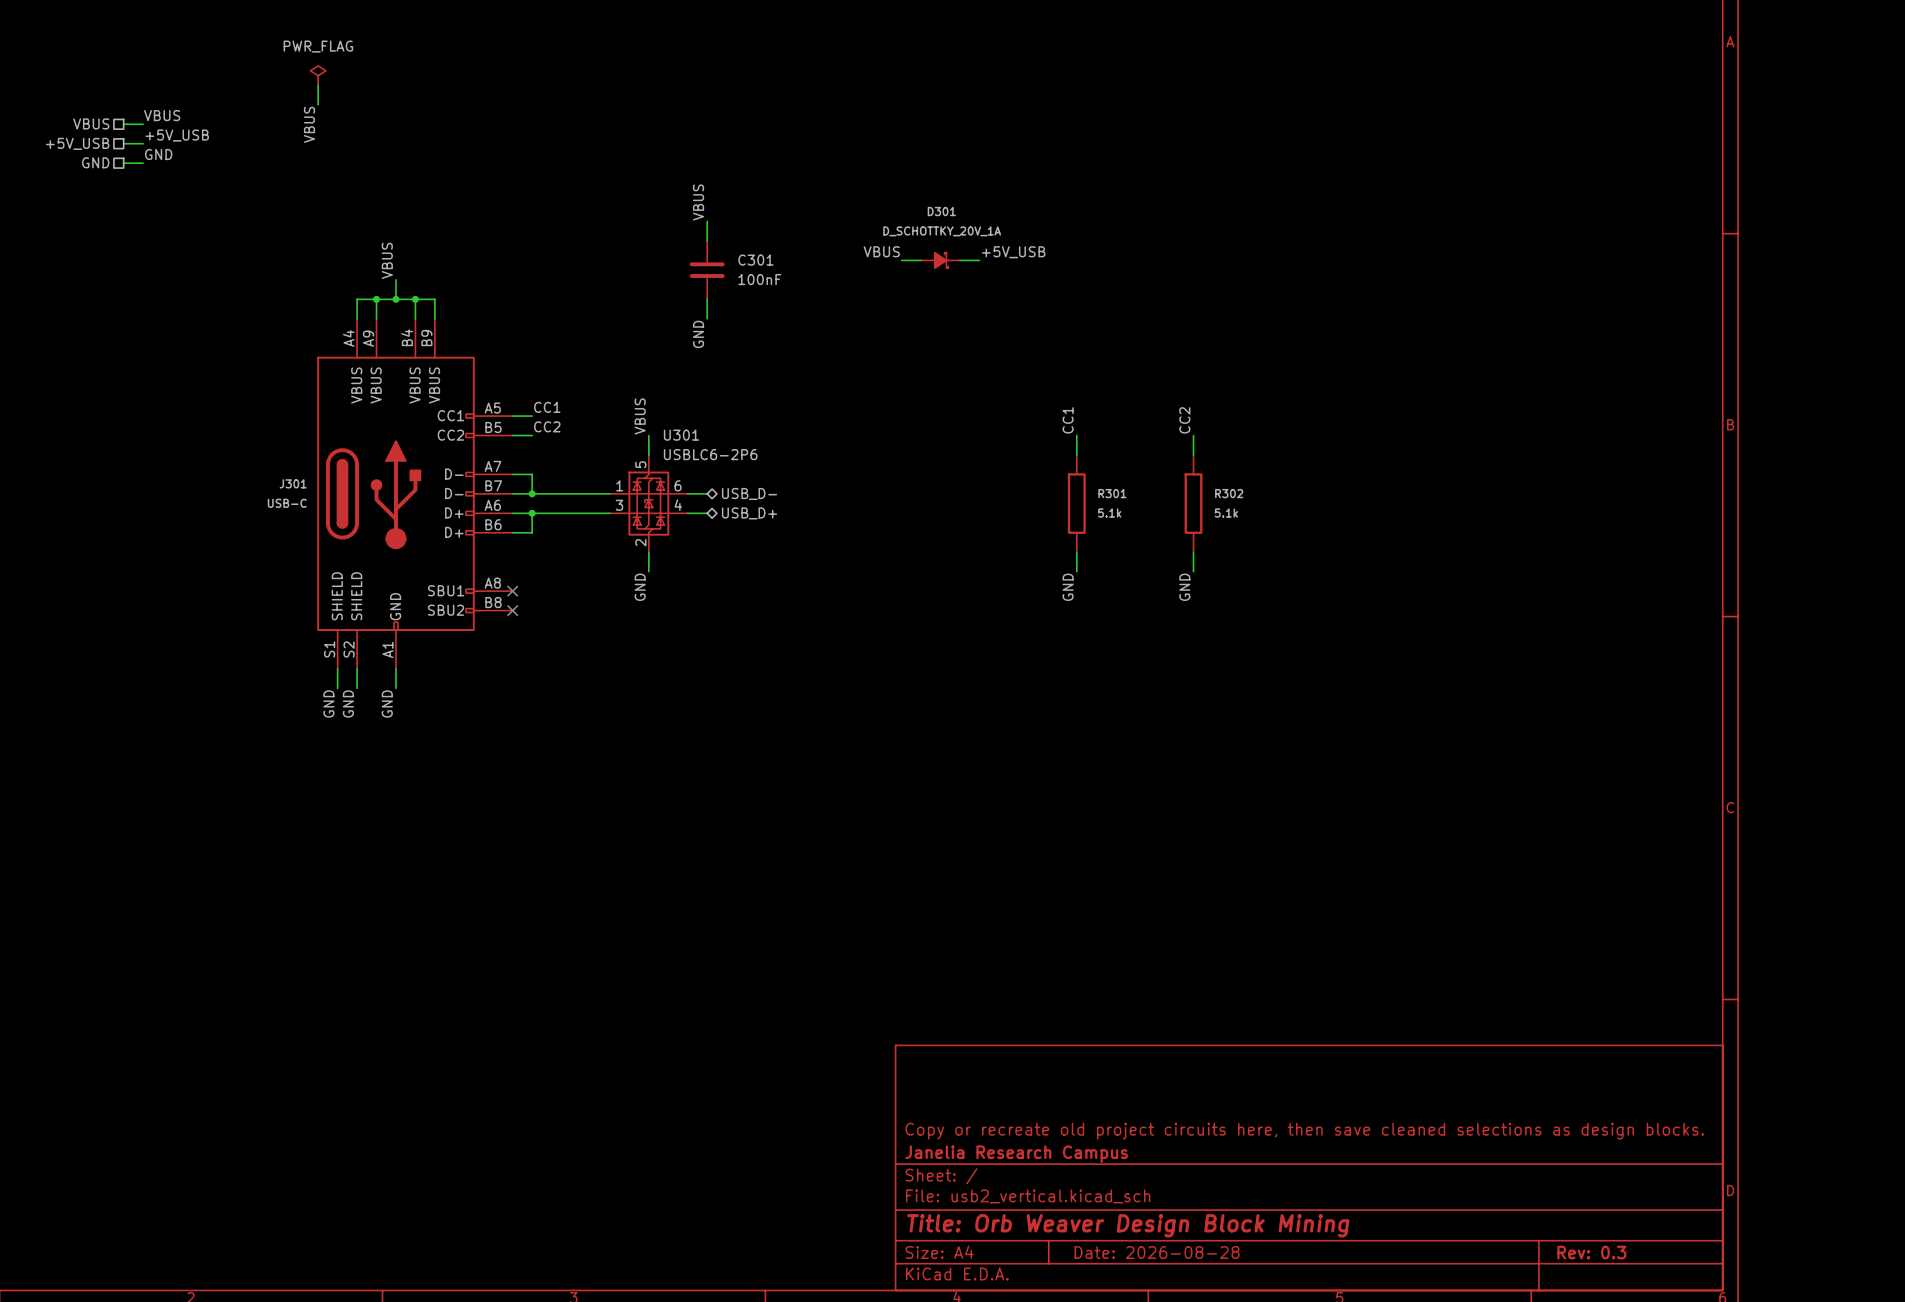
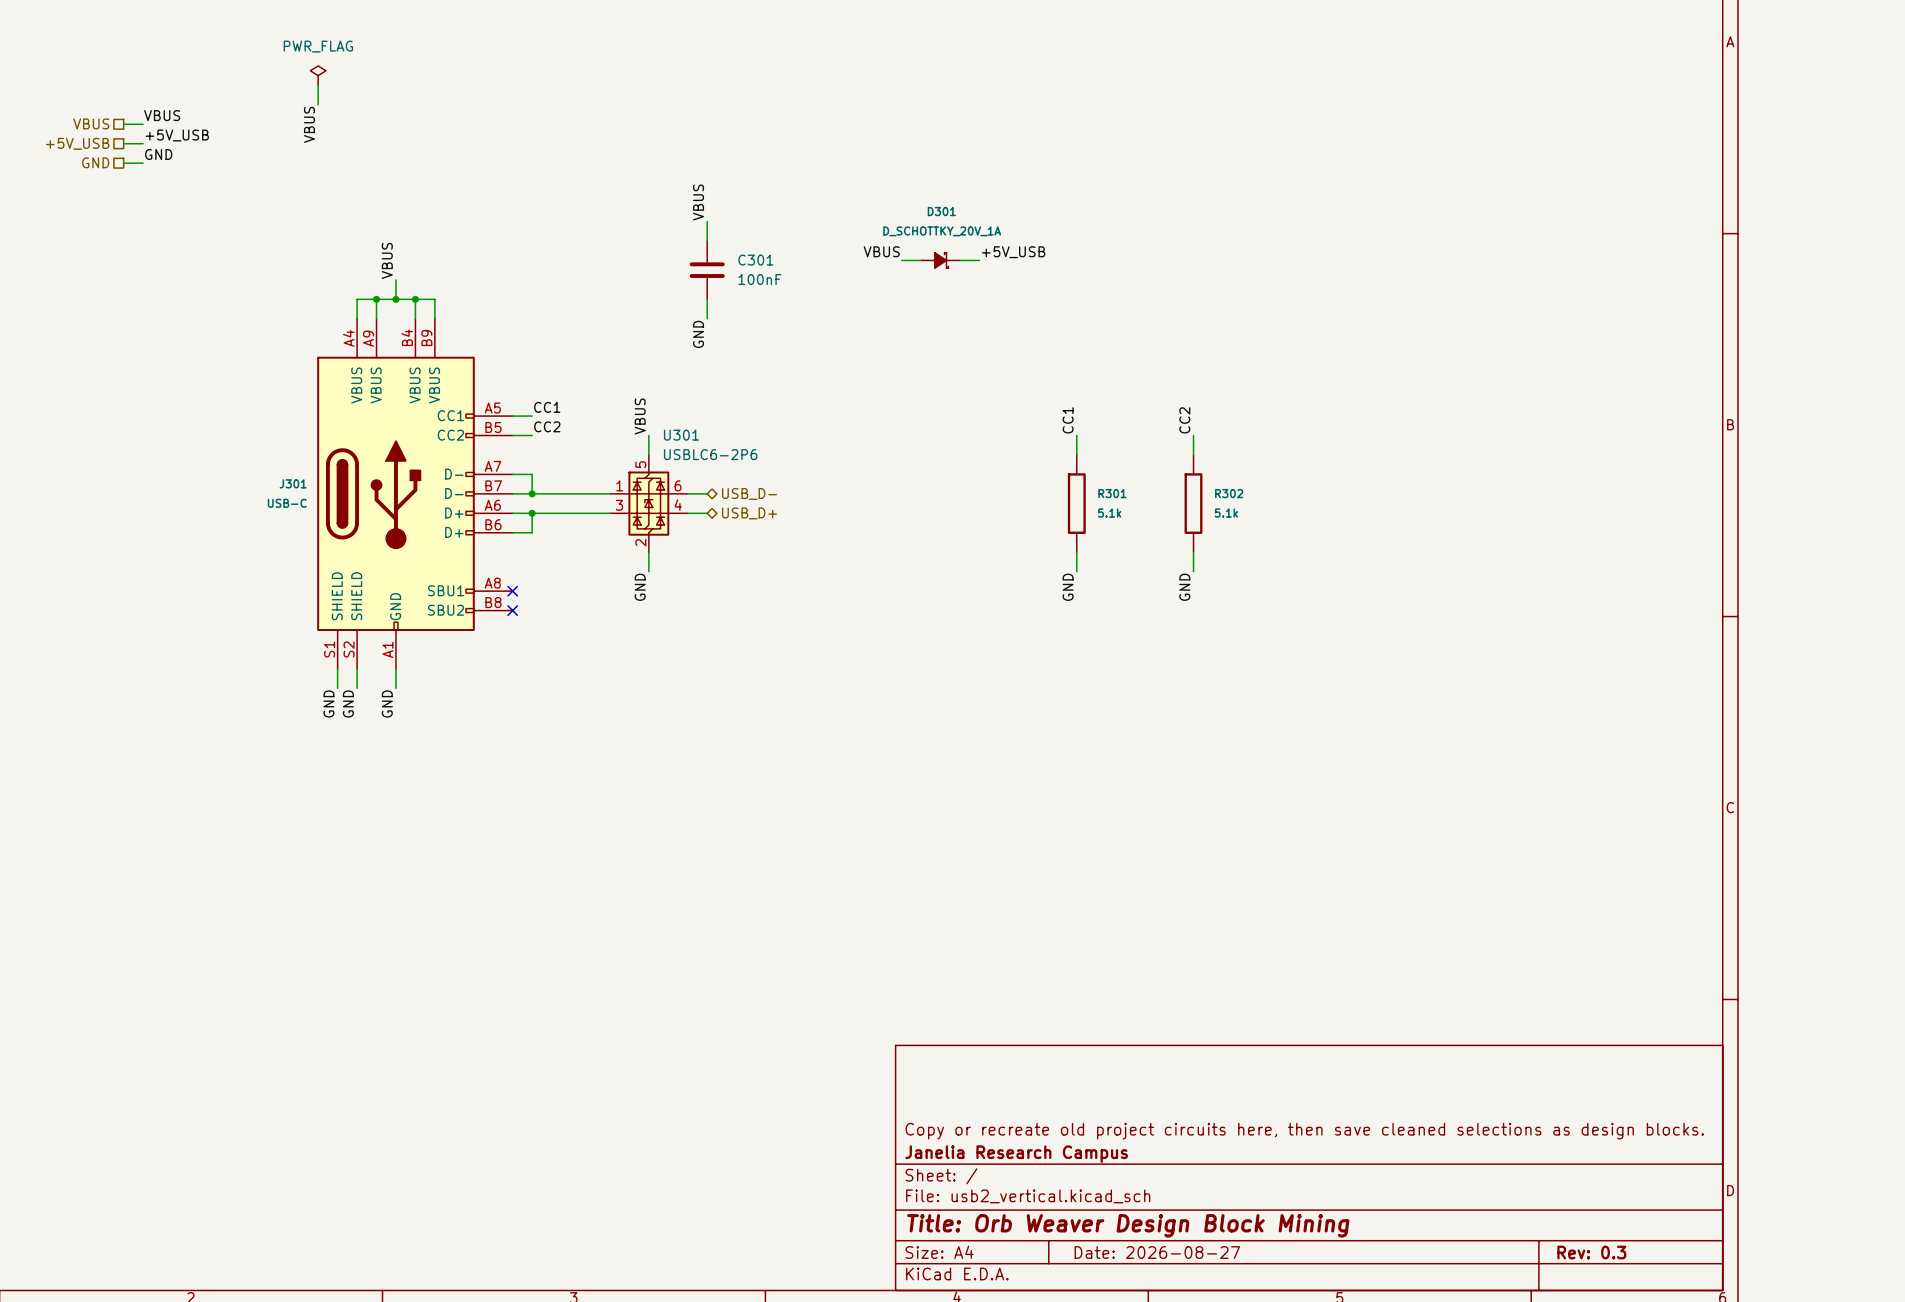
title block: Date: 2026-08-28 (1157, 1252) -> Date: 2026-08-27 (1157, 1252)

